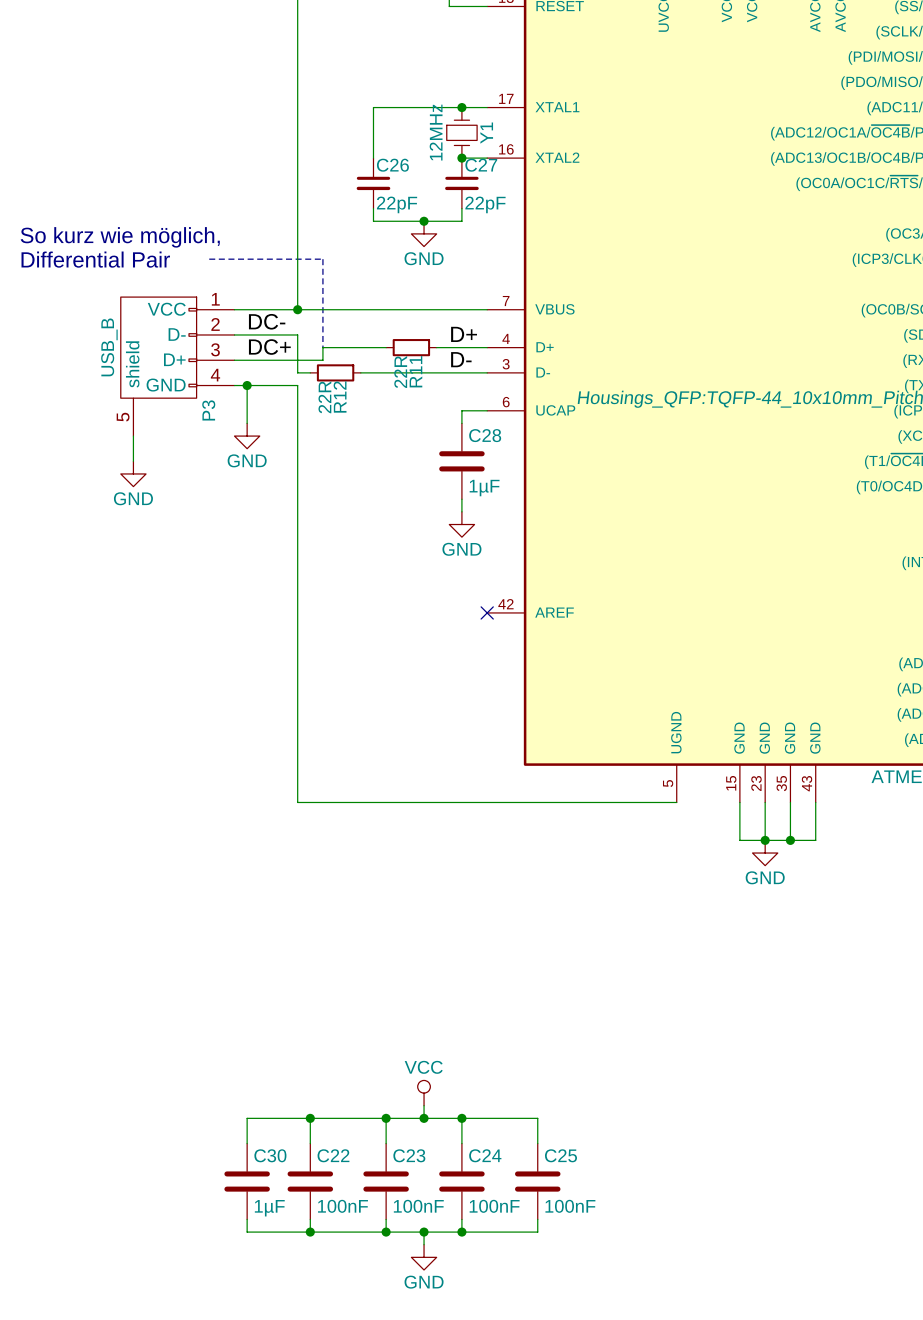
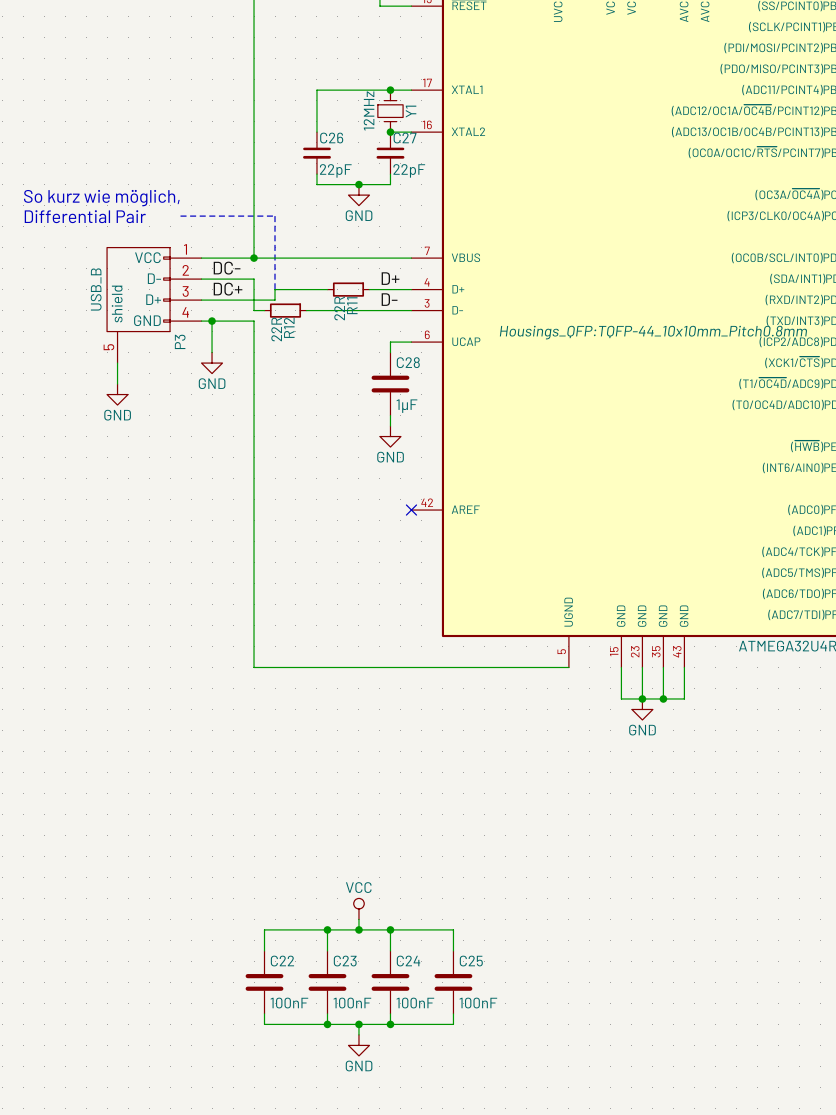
wire: (310, 1118) (247, 1118) (247, 1143) -> none
junction: (310, 1118) -> none
C30: 1µF (247, 1181) -> none
wire: (247, 1219) (247, 1232) (310, 1232) -> none
junction: (310, 1232) -> none

